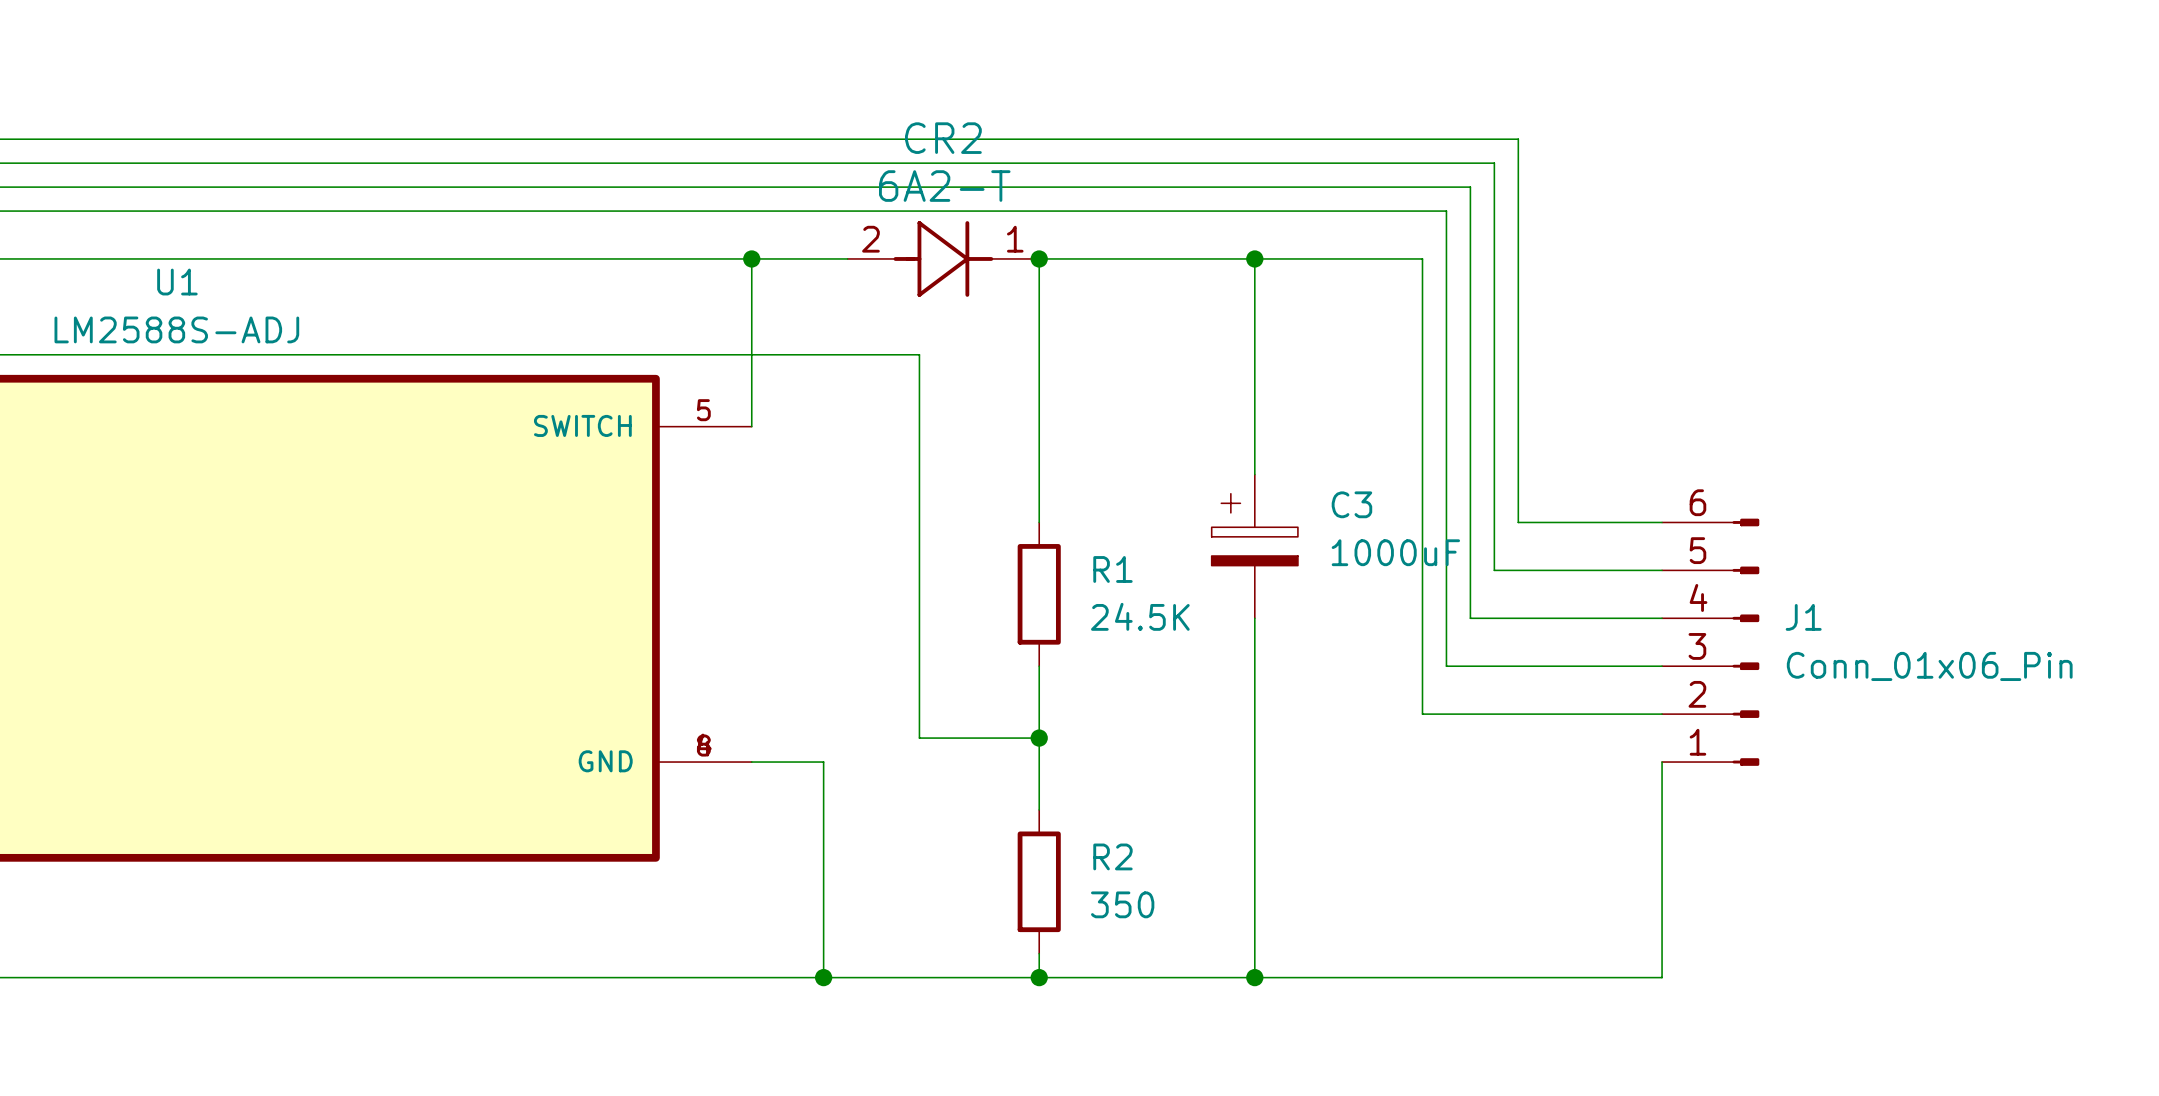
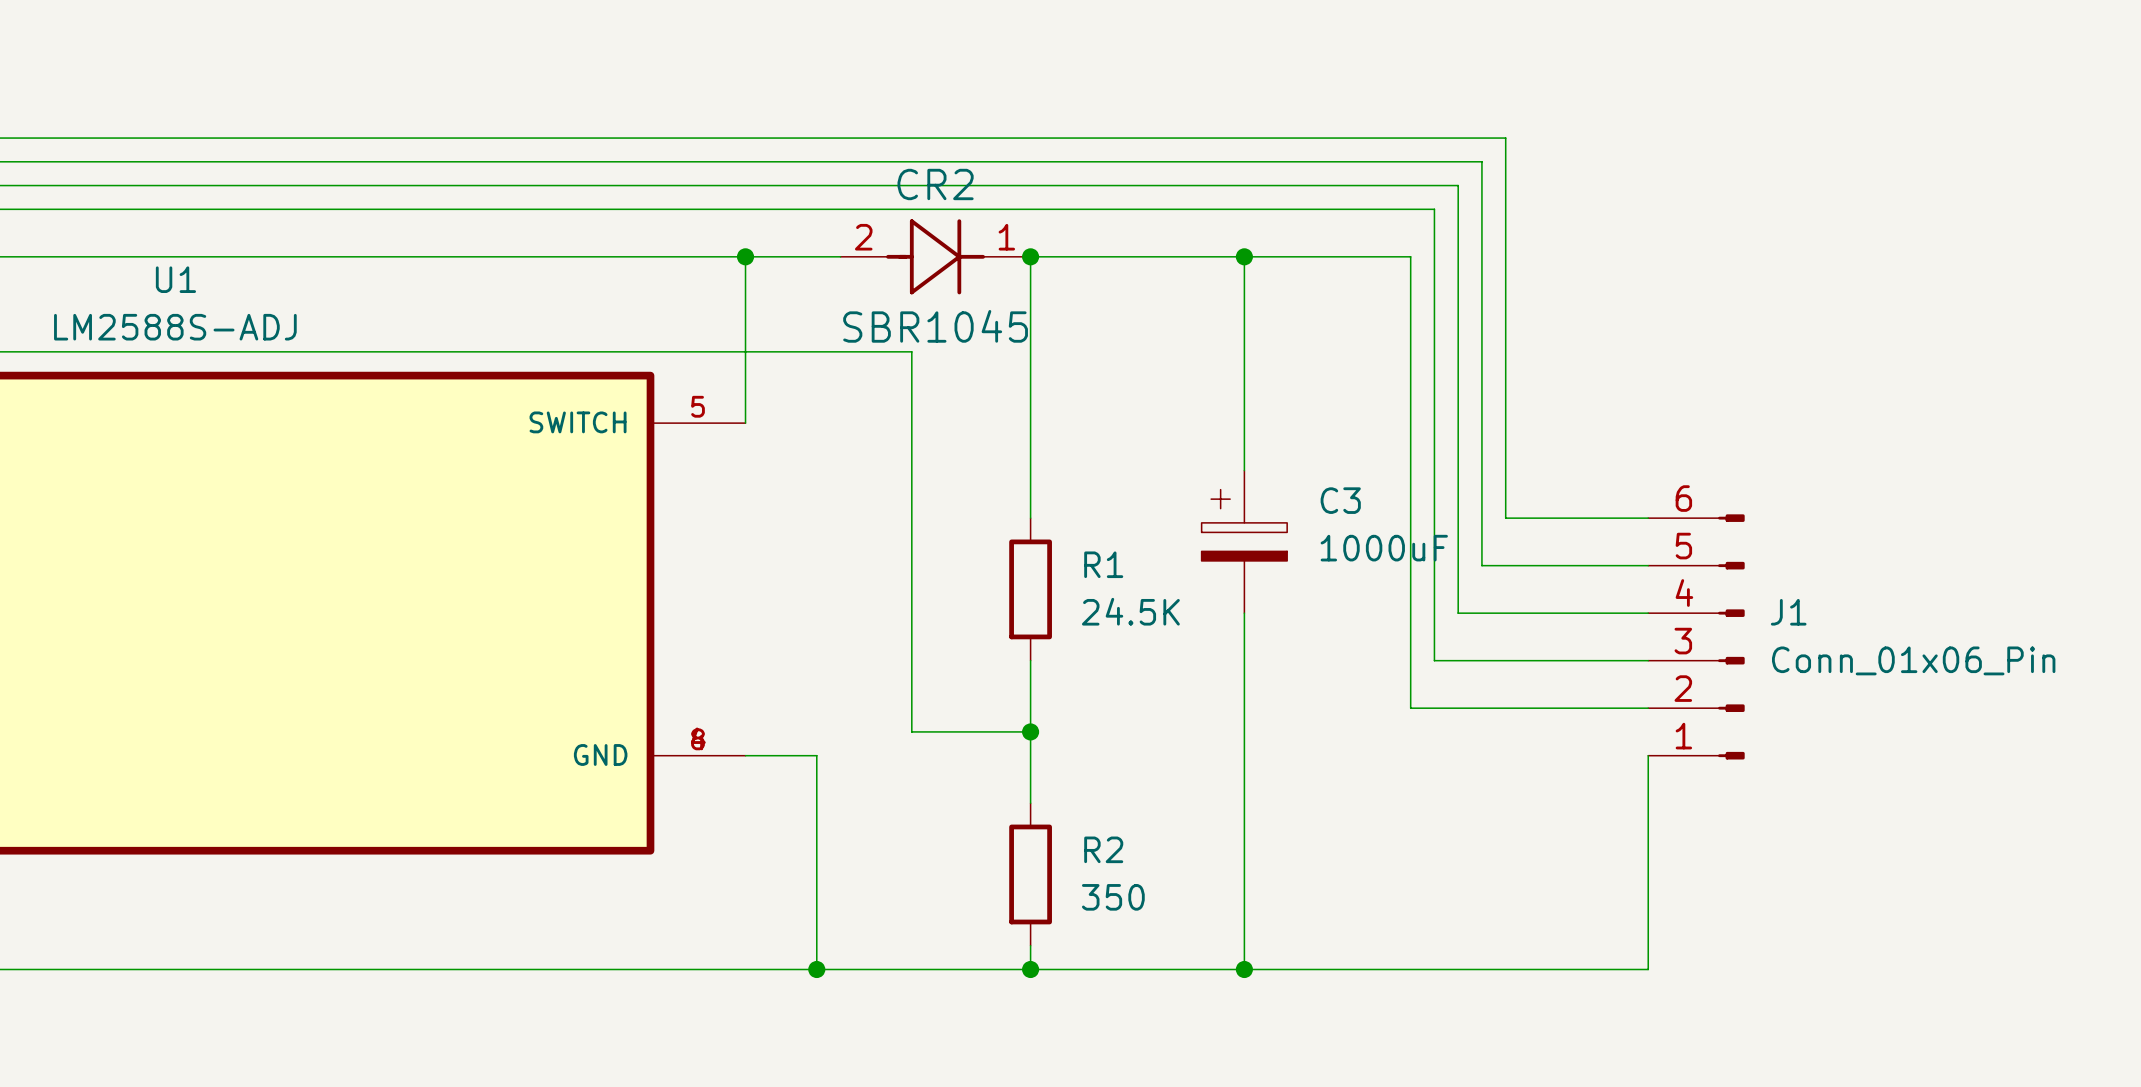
CR2 name position: CR2 (943, 138) -> CR2 (935, 184)
CR2 value: 6A2-T (944, 186) -> SBR1045 (935, 326)

